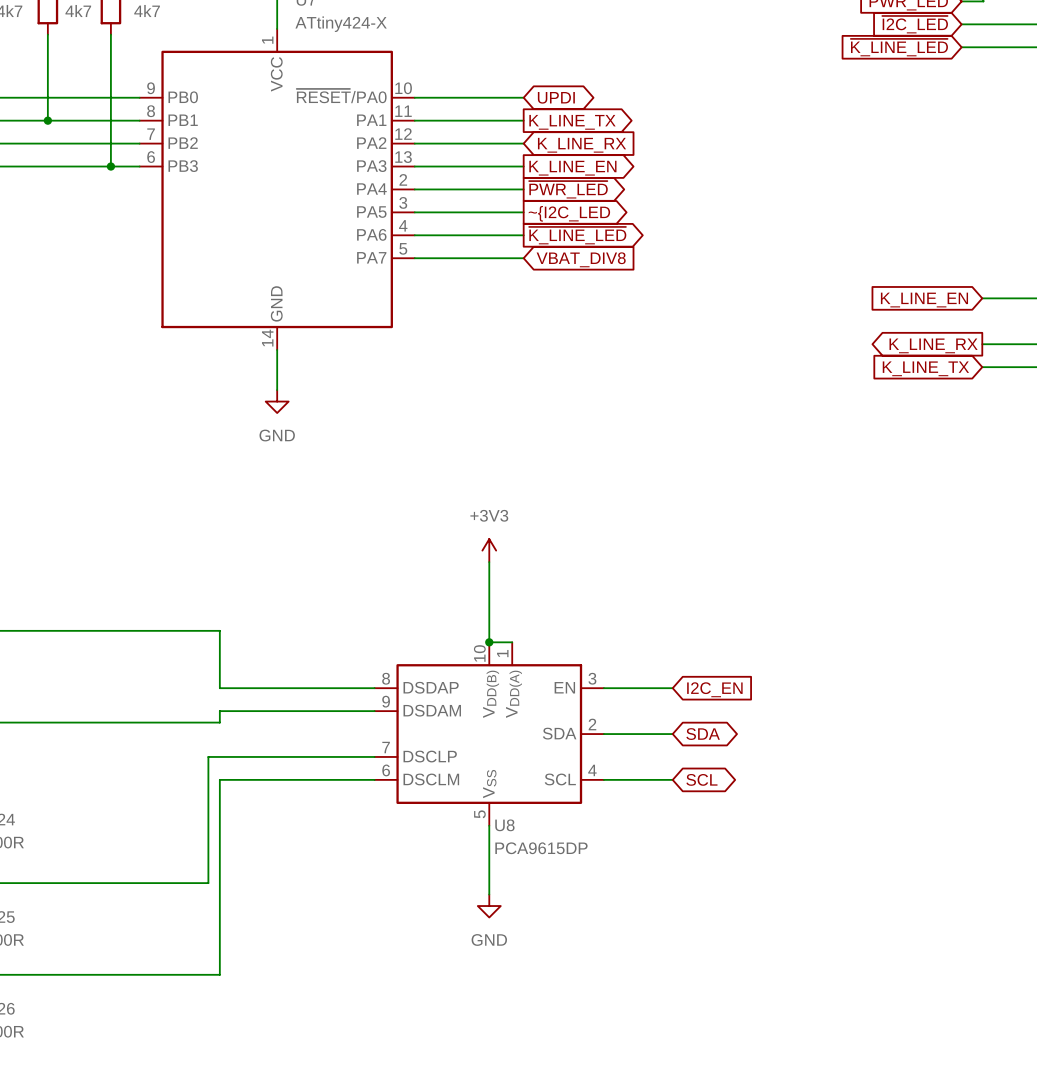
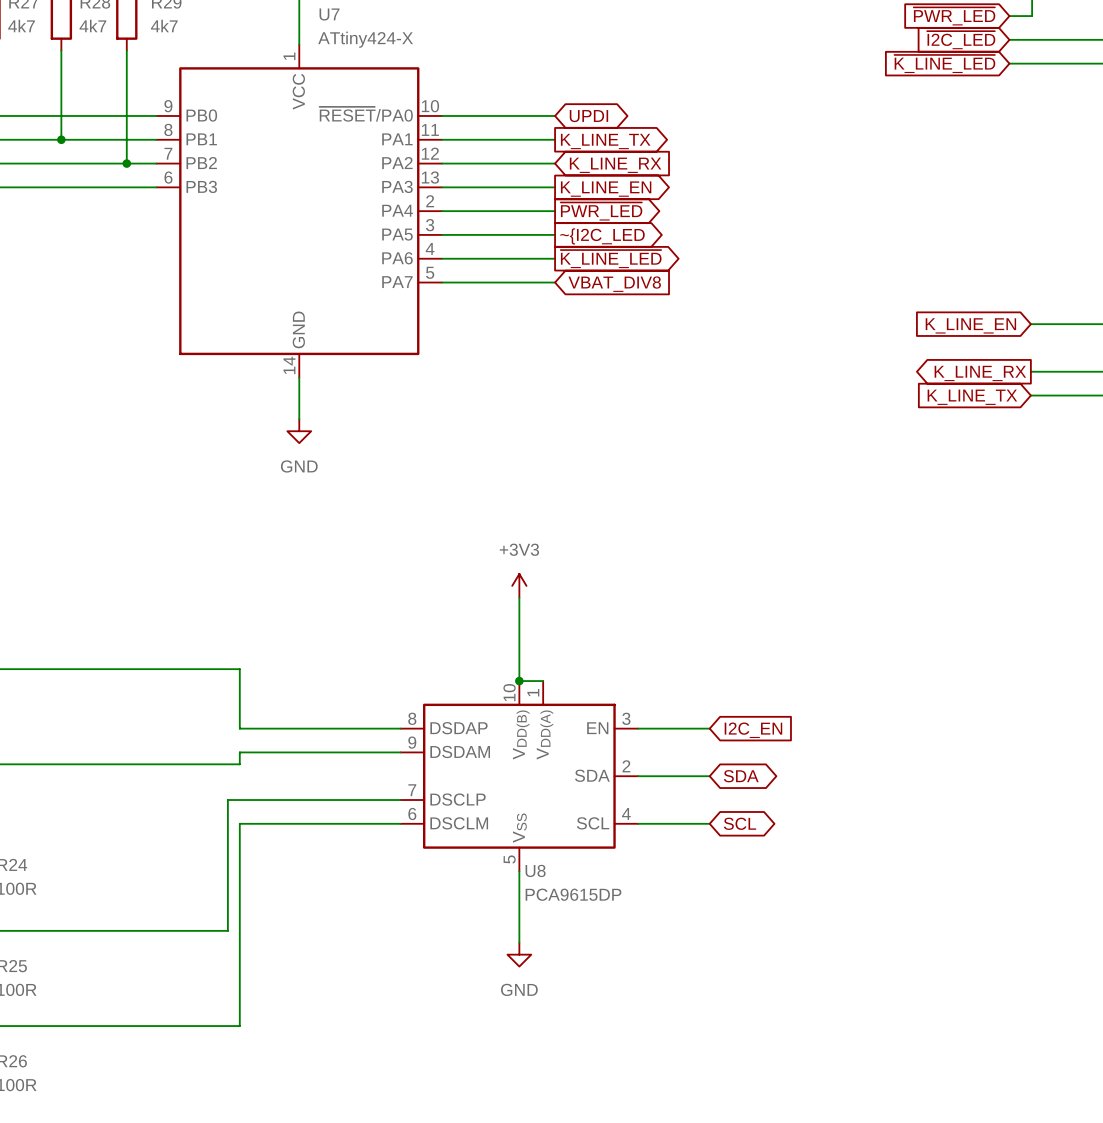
wire: (110, 143) (110, 166) -> none
junction position: (110, 166) -> (126, 163)

